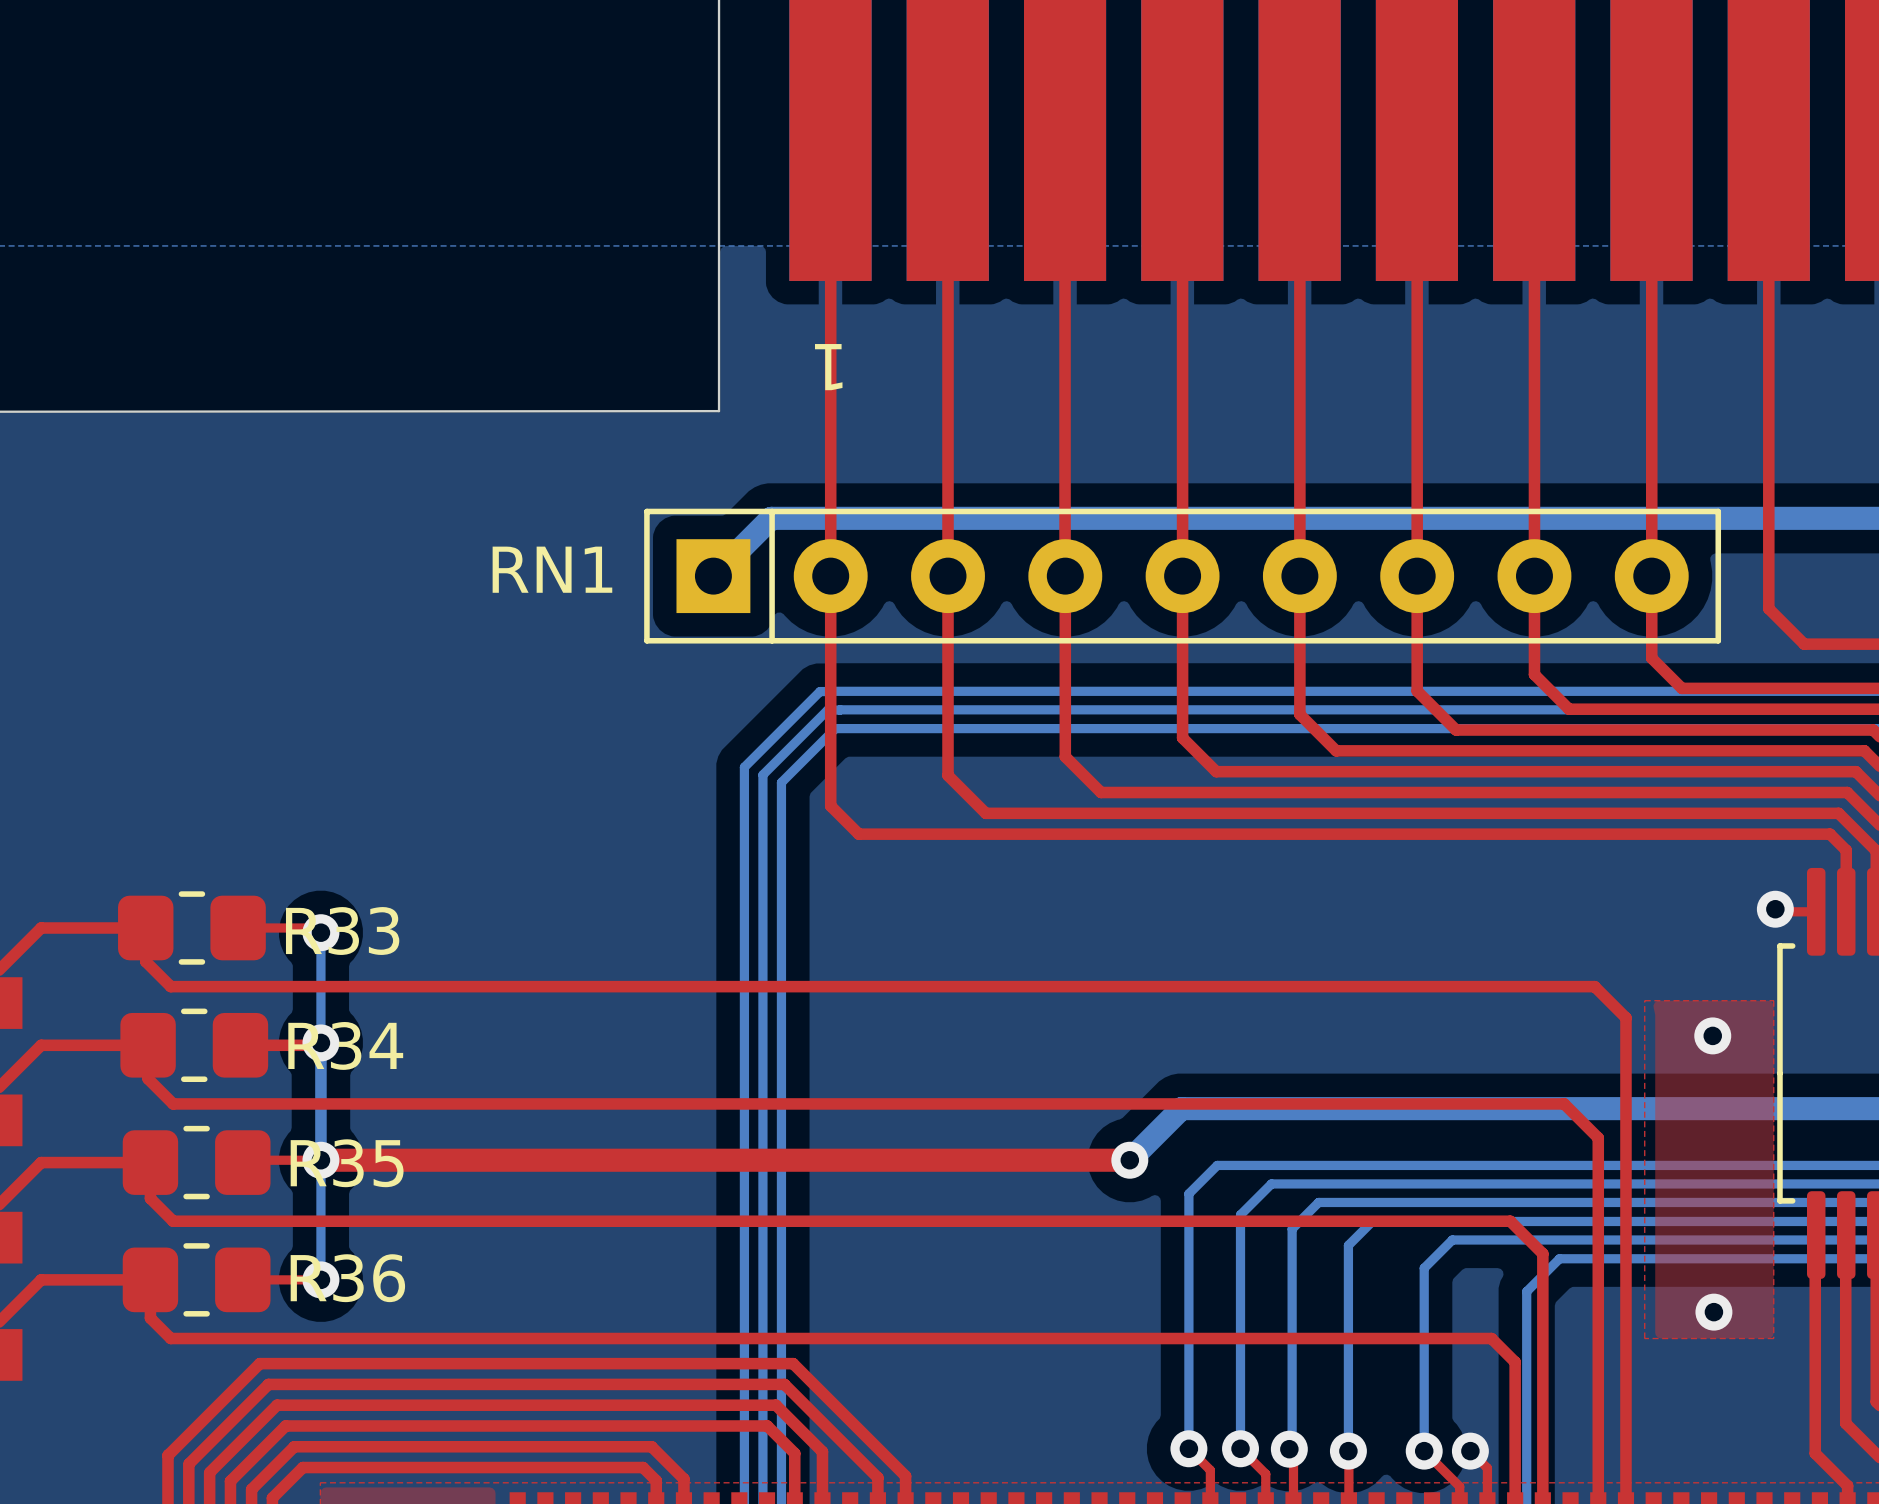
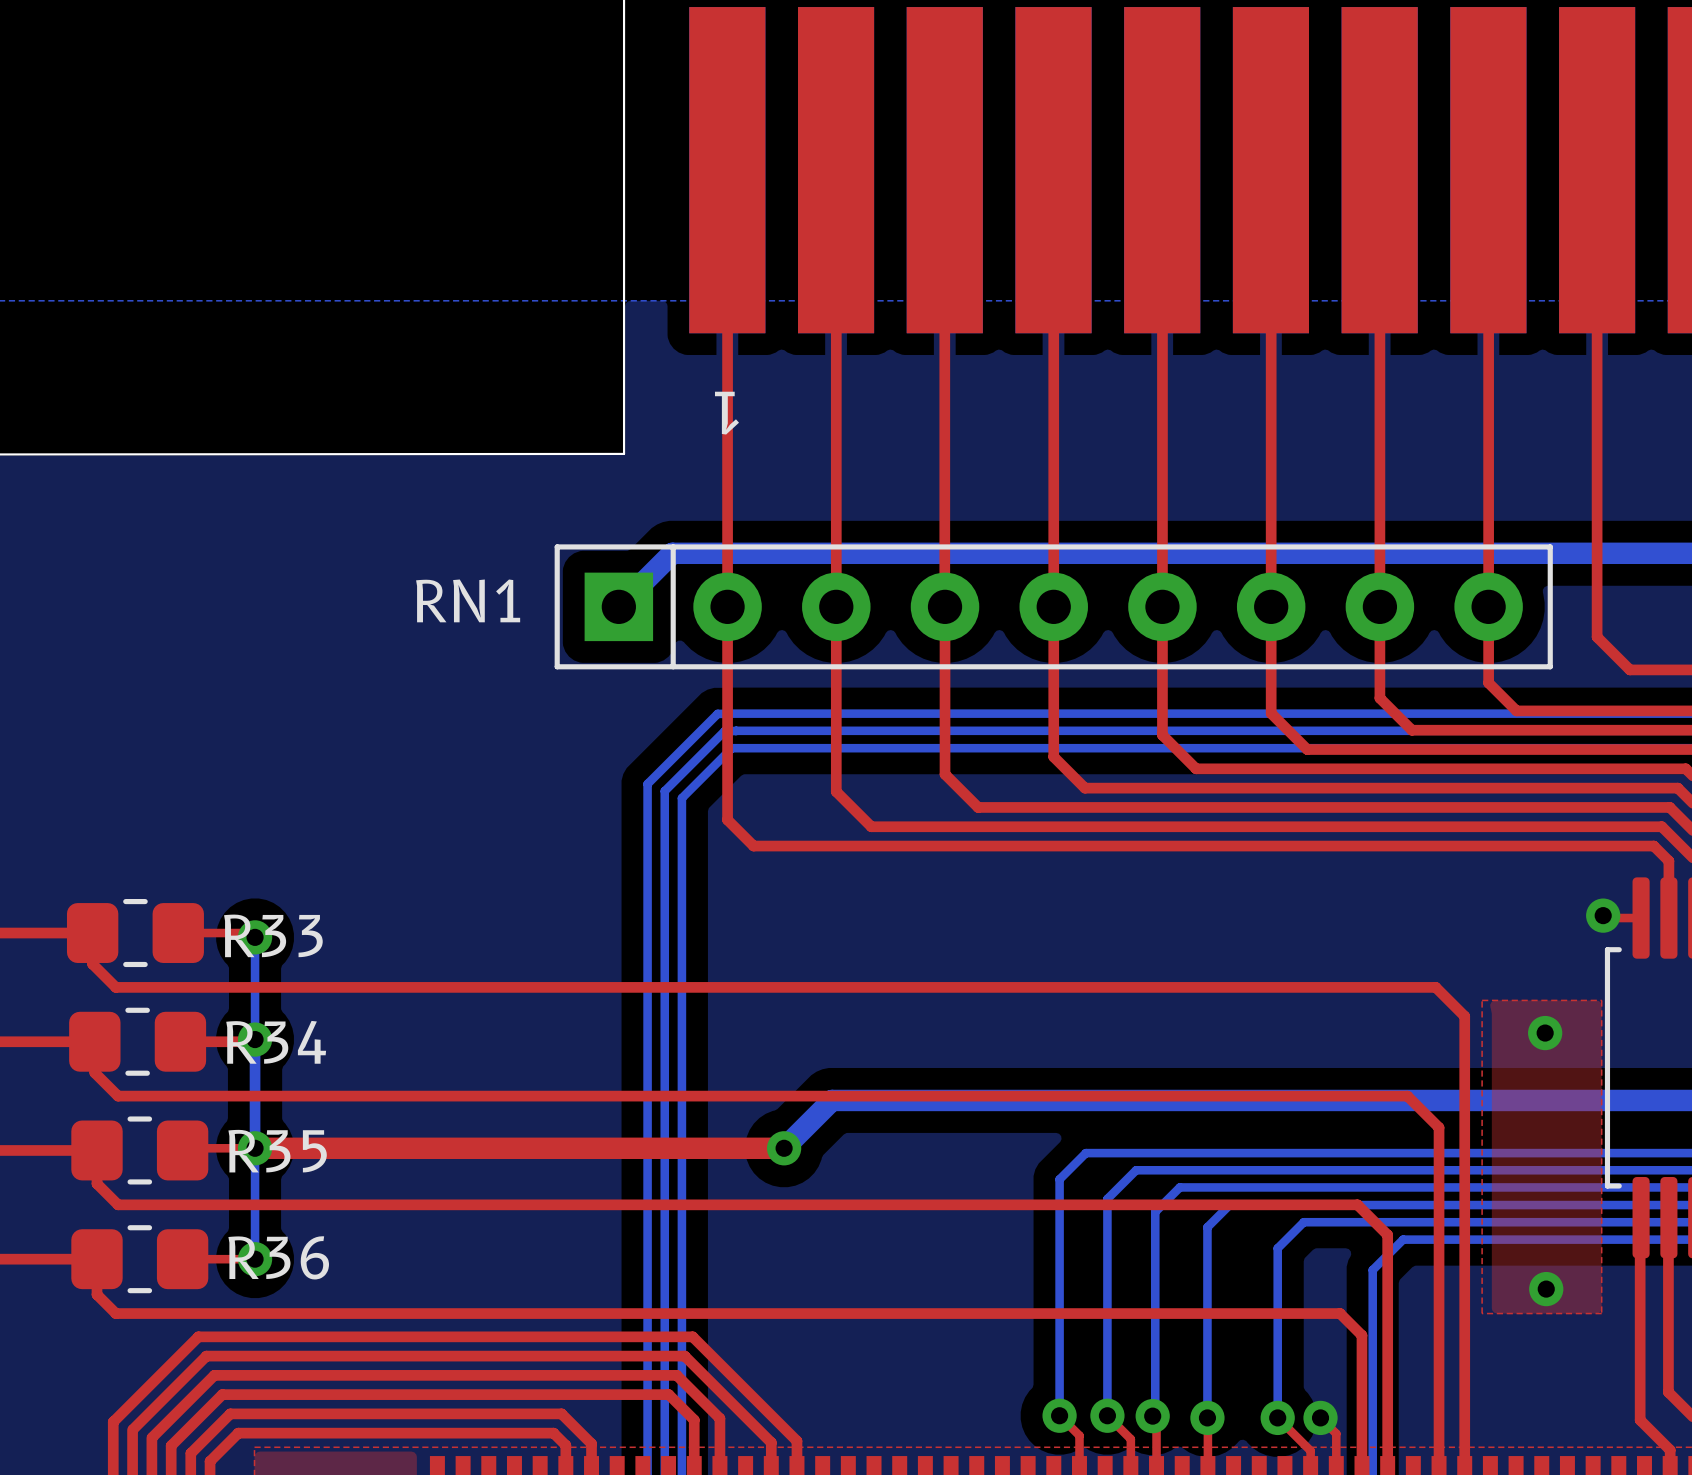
bottom track: (1181, 1108) (1129, 1160) -> (1052, 1100) (831, 1100) (784, 1148)
top track: (891, 1160) (1129, 1160) -> none
via position: (1129, 1160) -> (784, 1148)

